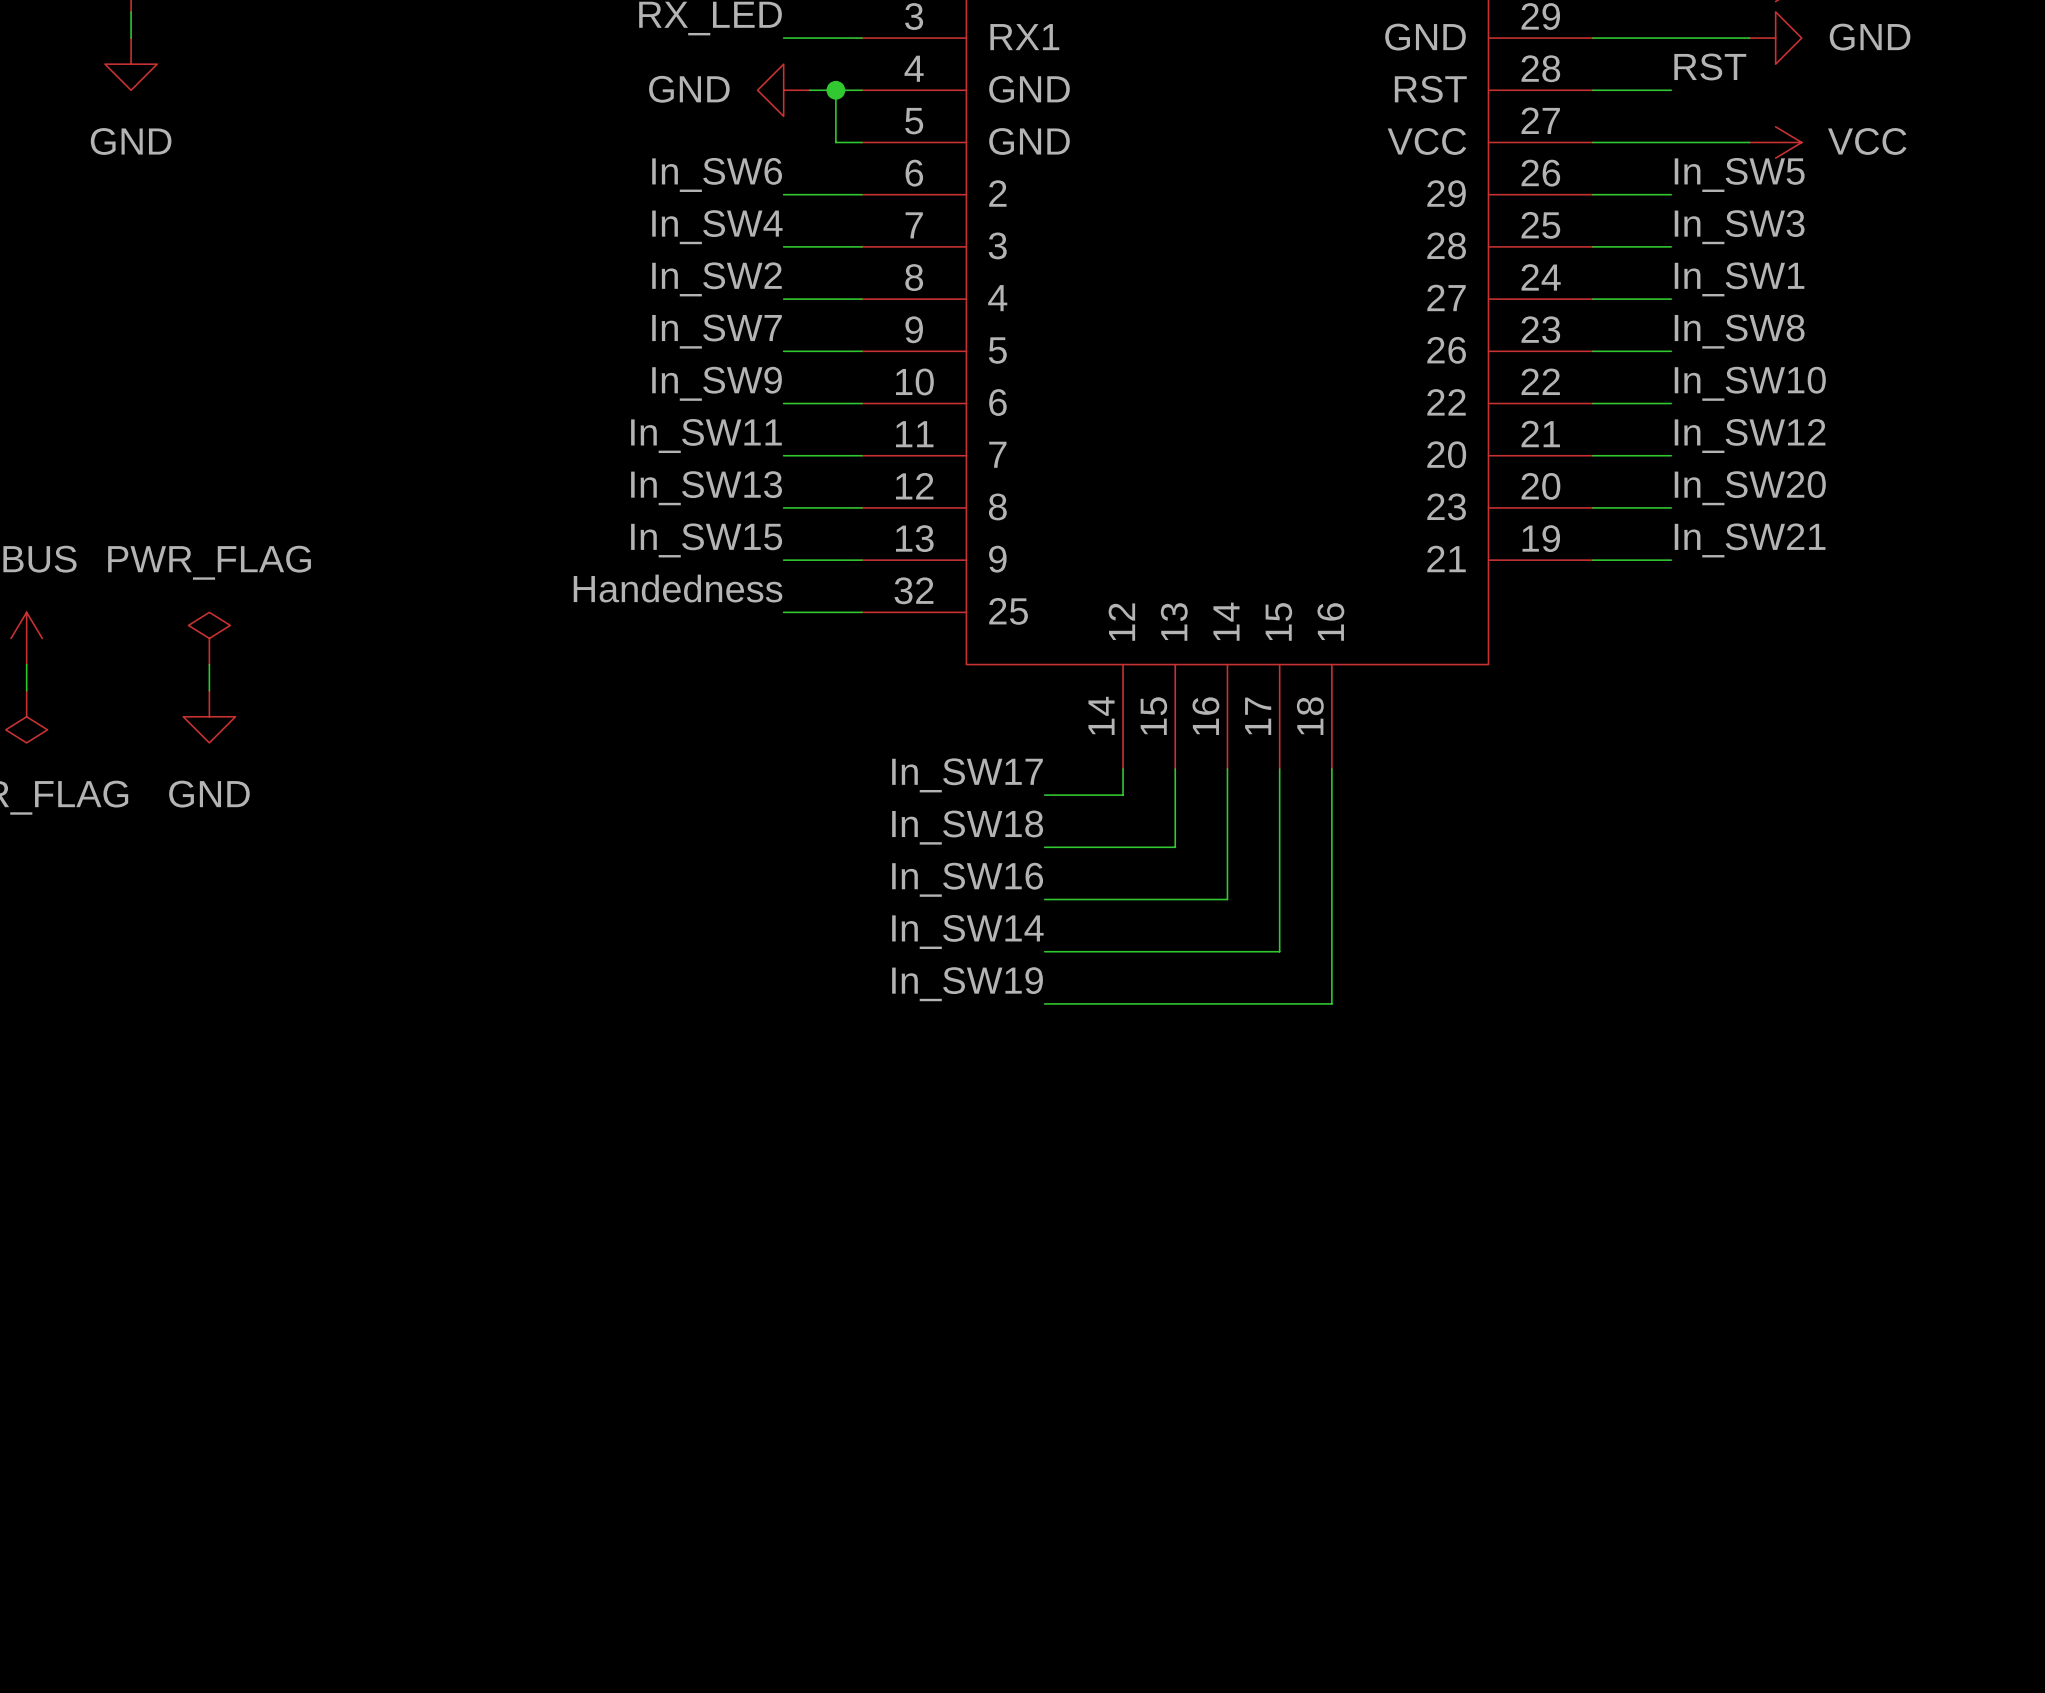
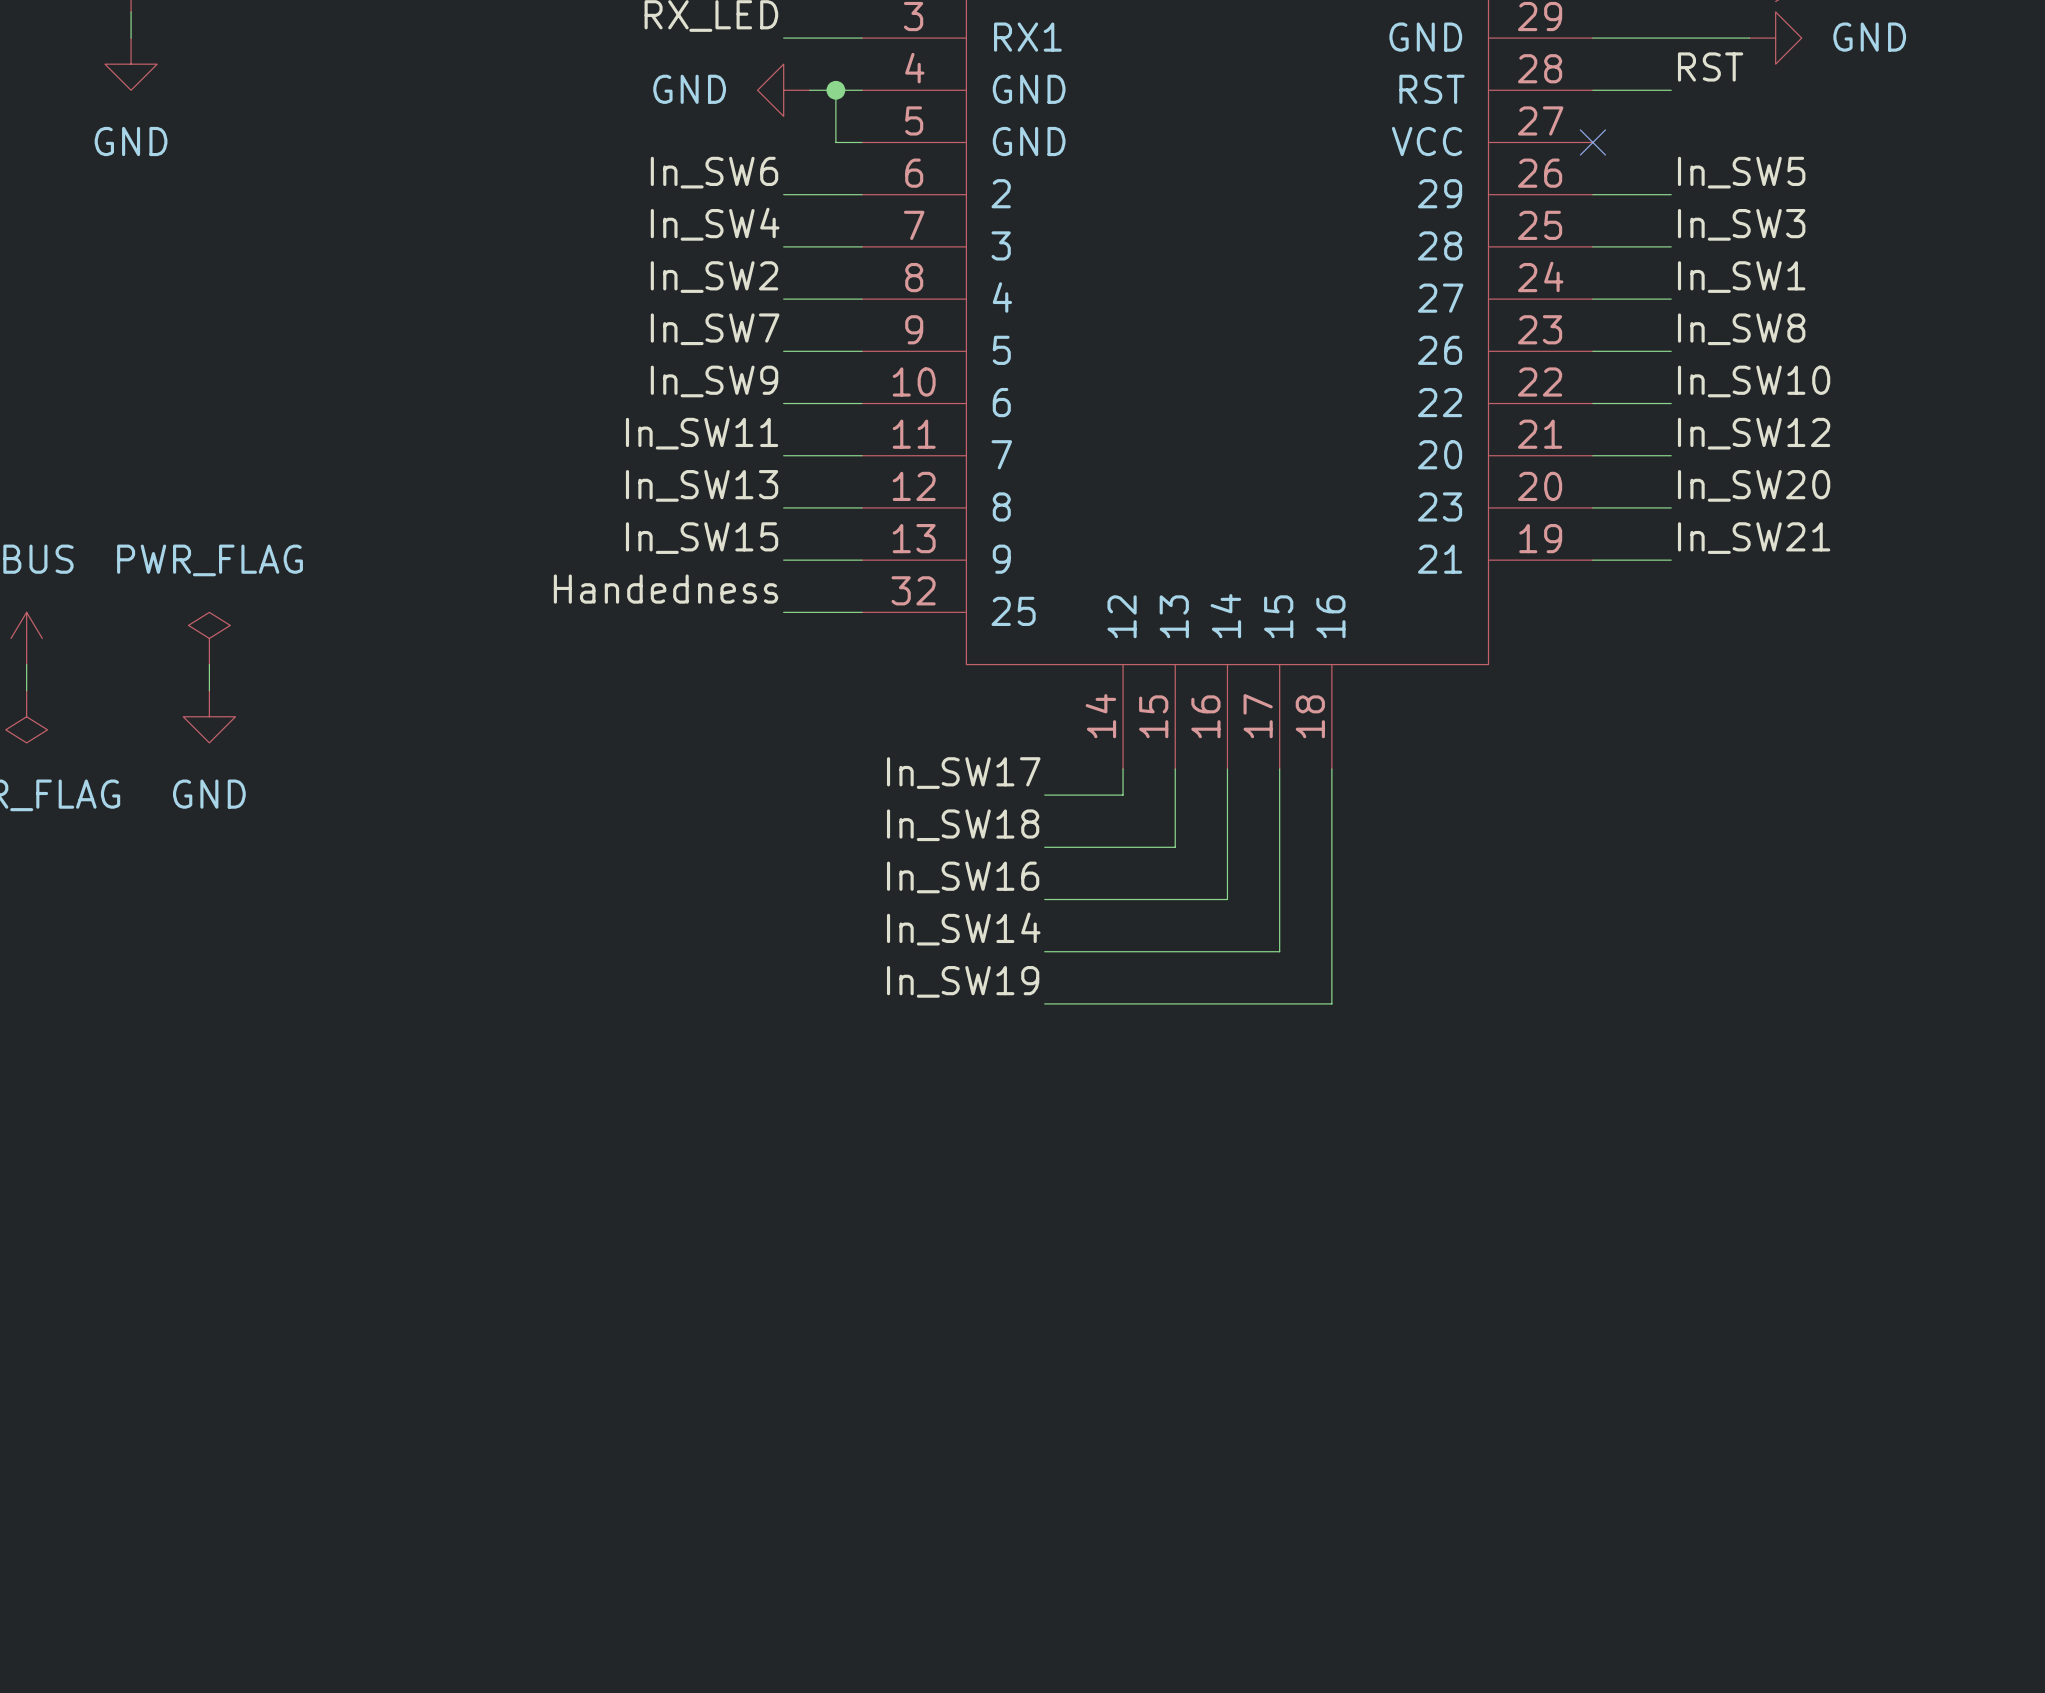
wire: (1592, 142) (1749, 142) -> none
no-connect mark: none -> (1592, 142)
power symbol: VCC (1775, 142) -> none

